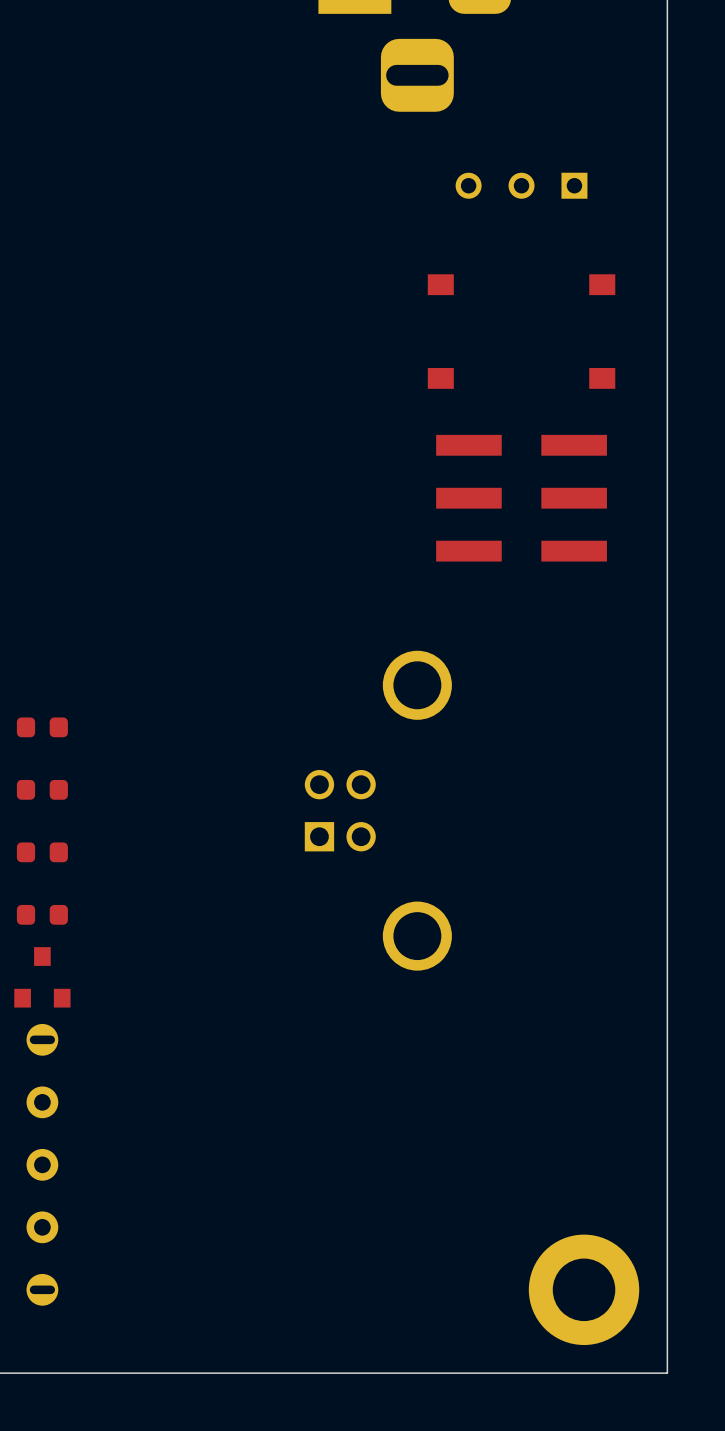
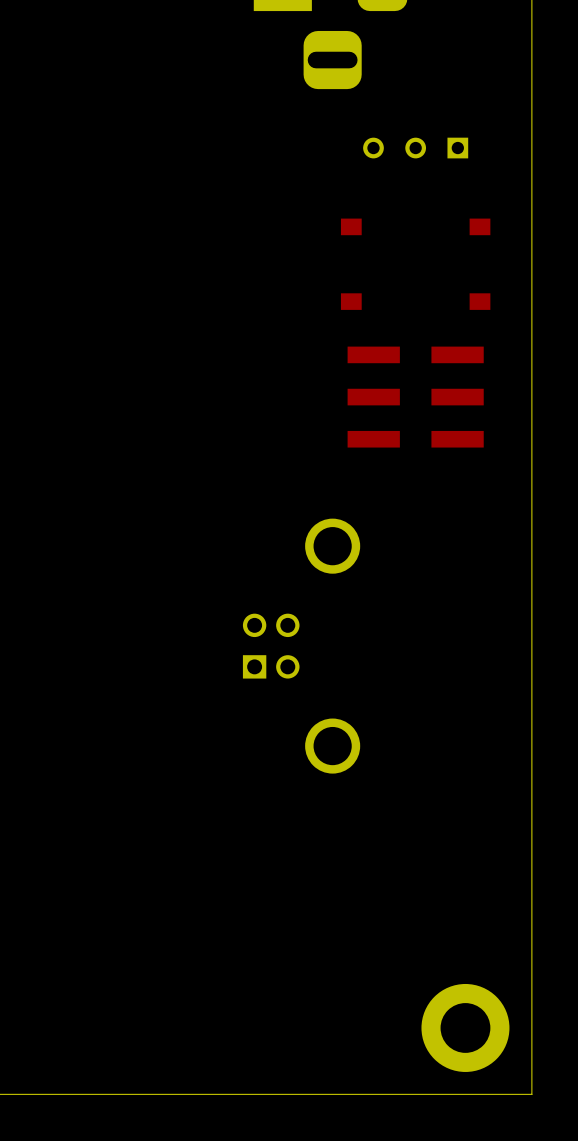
part: (42, 727) -> none
part: (42, 789) -> none
part: (42, 852) -> none
part: (42, 914) -> none
part: (42, 977) -> none
part: (42, 1164) -> none

